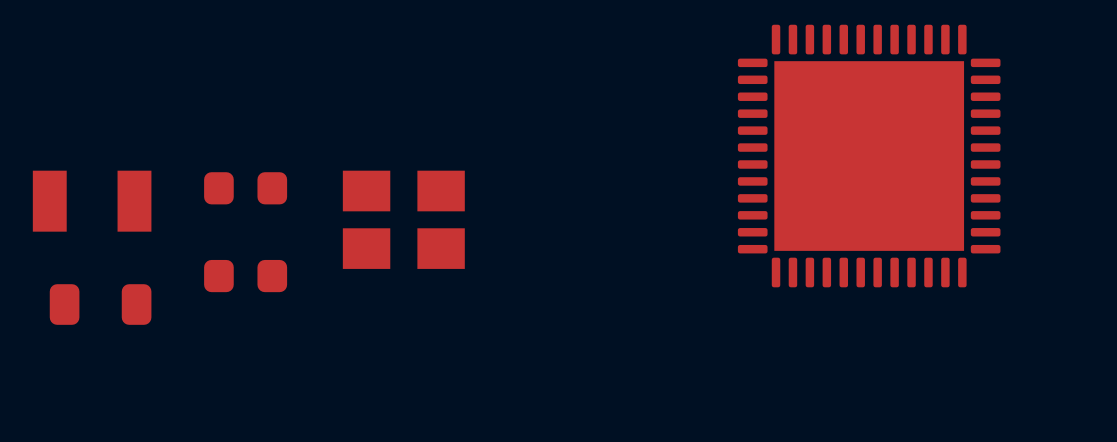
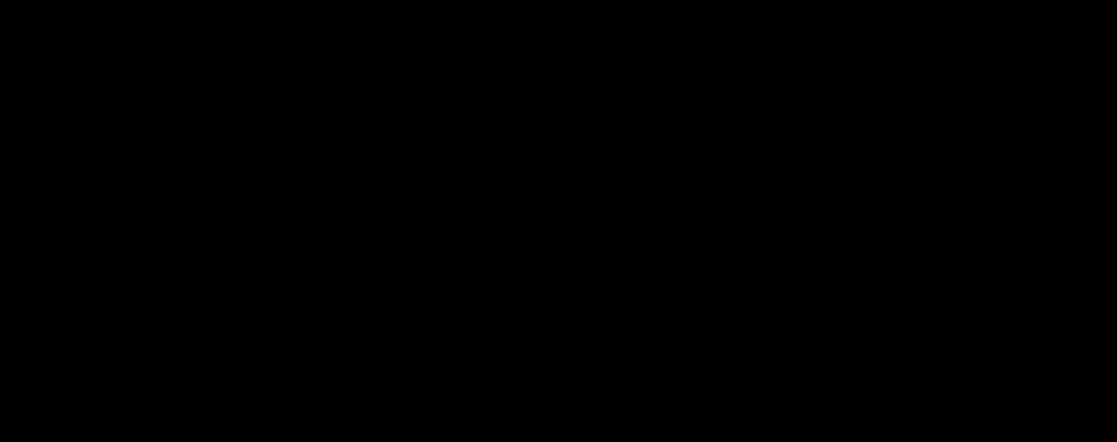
part: (869, 156) -> none
part: (245, 188) -> none
part: (92, 201) -> none
part: (403, 219) -> none
part: (245, 276) -> none
part: (100, 304) -> none

